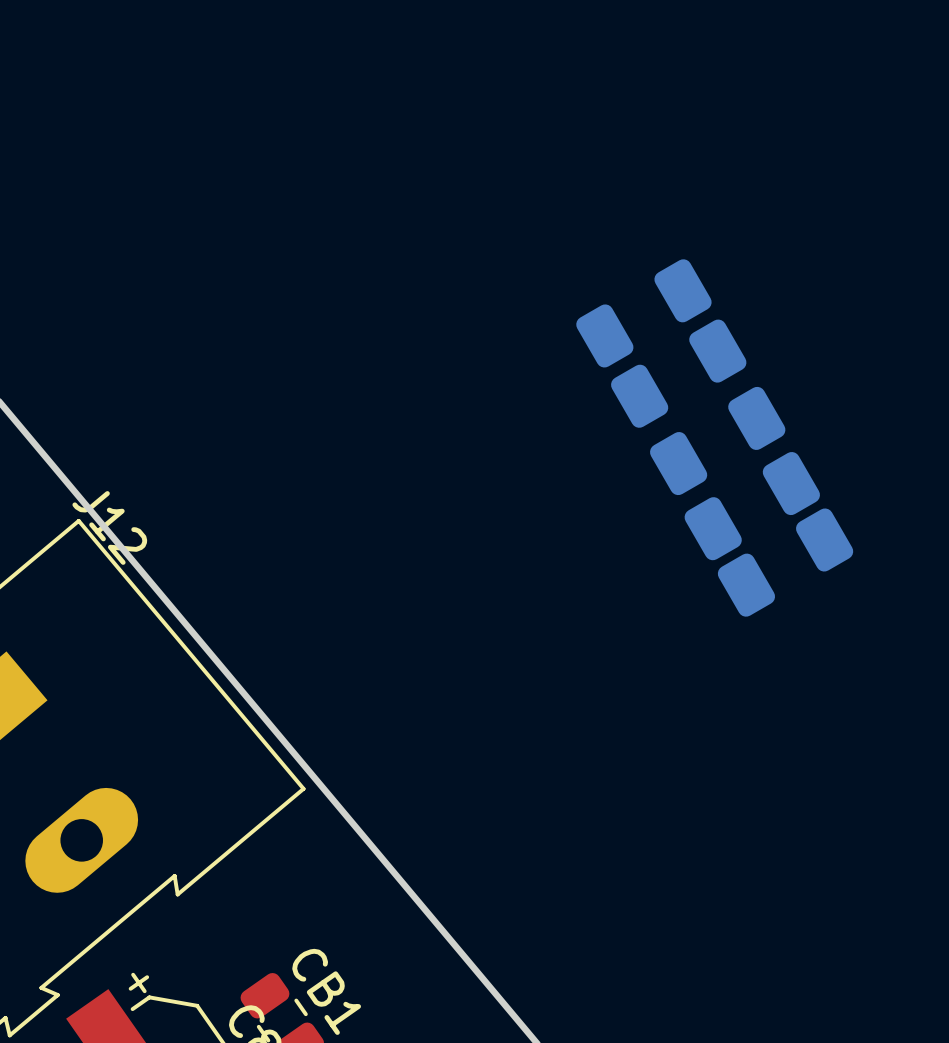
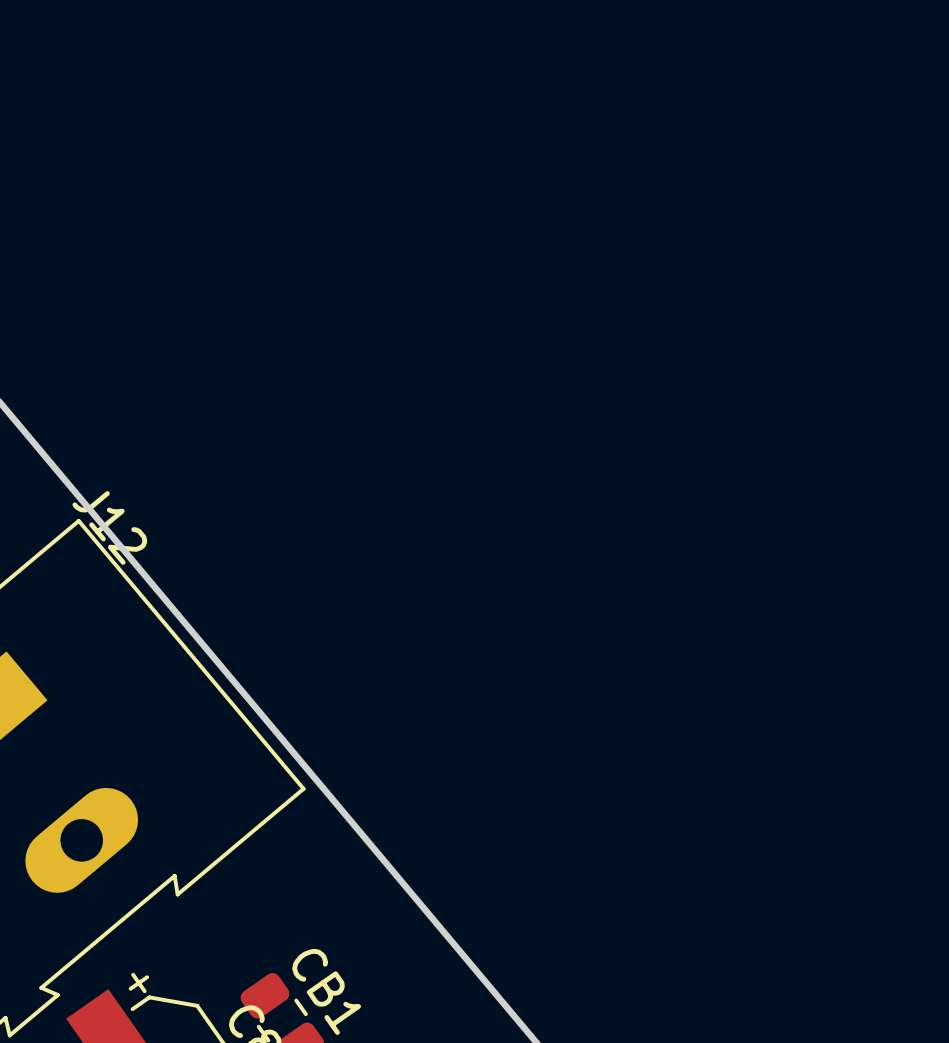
part: (643, 313) -> none
part: (678, 373) -> none
part: (717, 440) -> none
part: (752, 506) -> none
part: (785, 562) -> none

